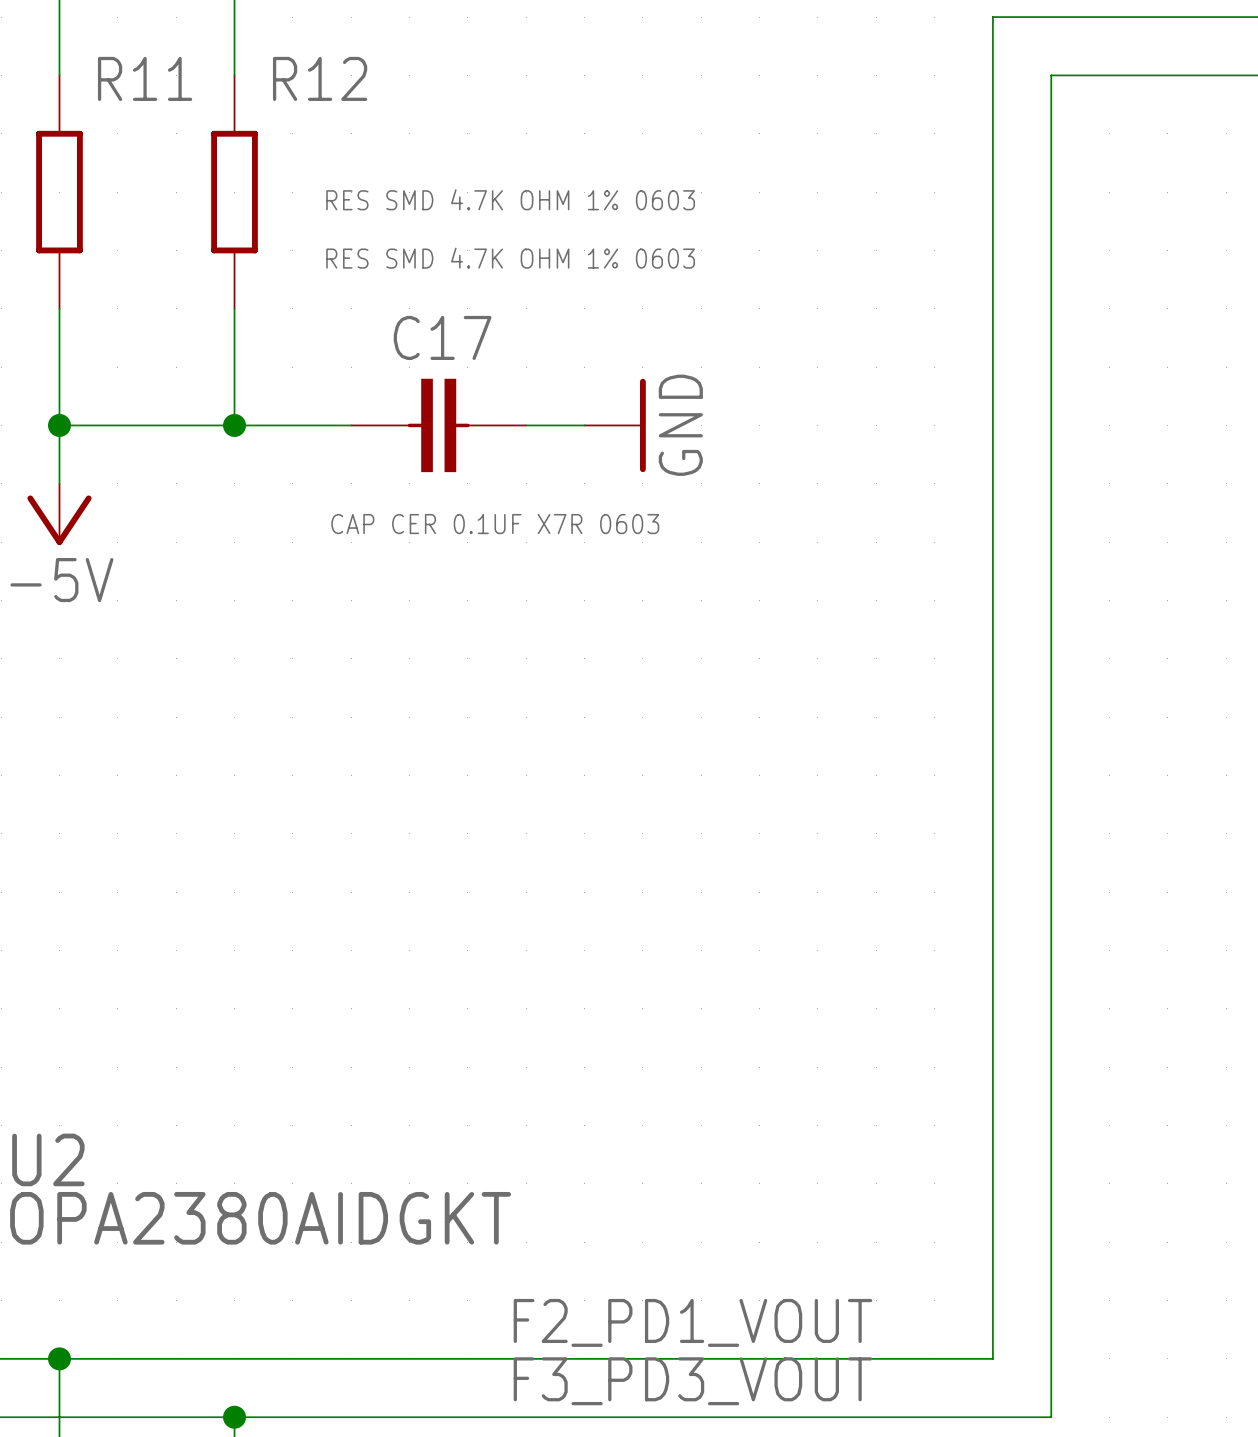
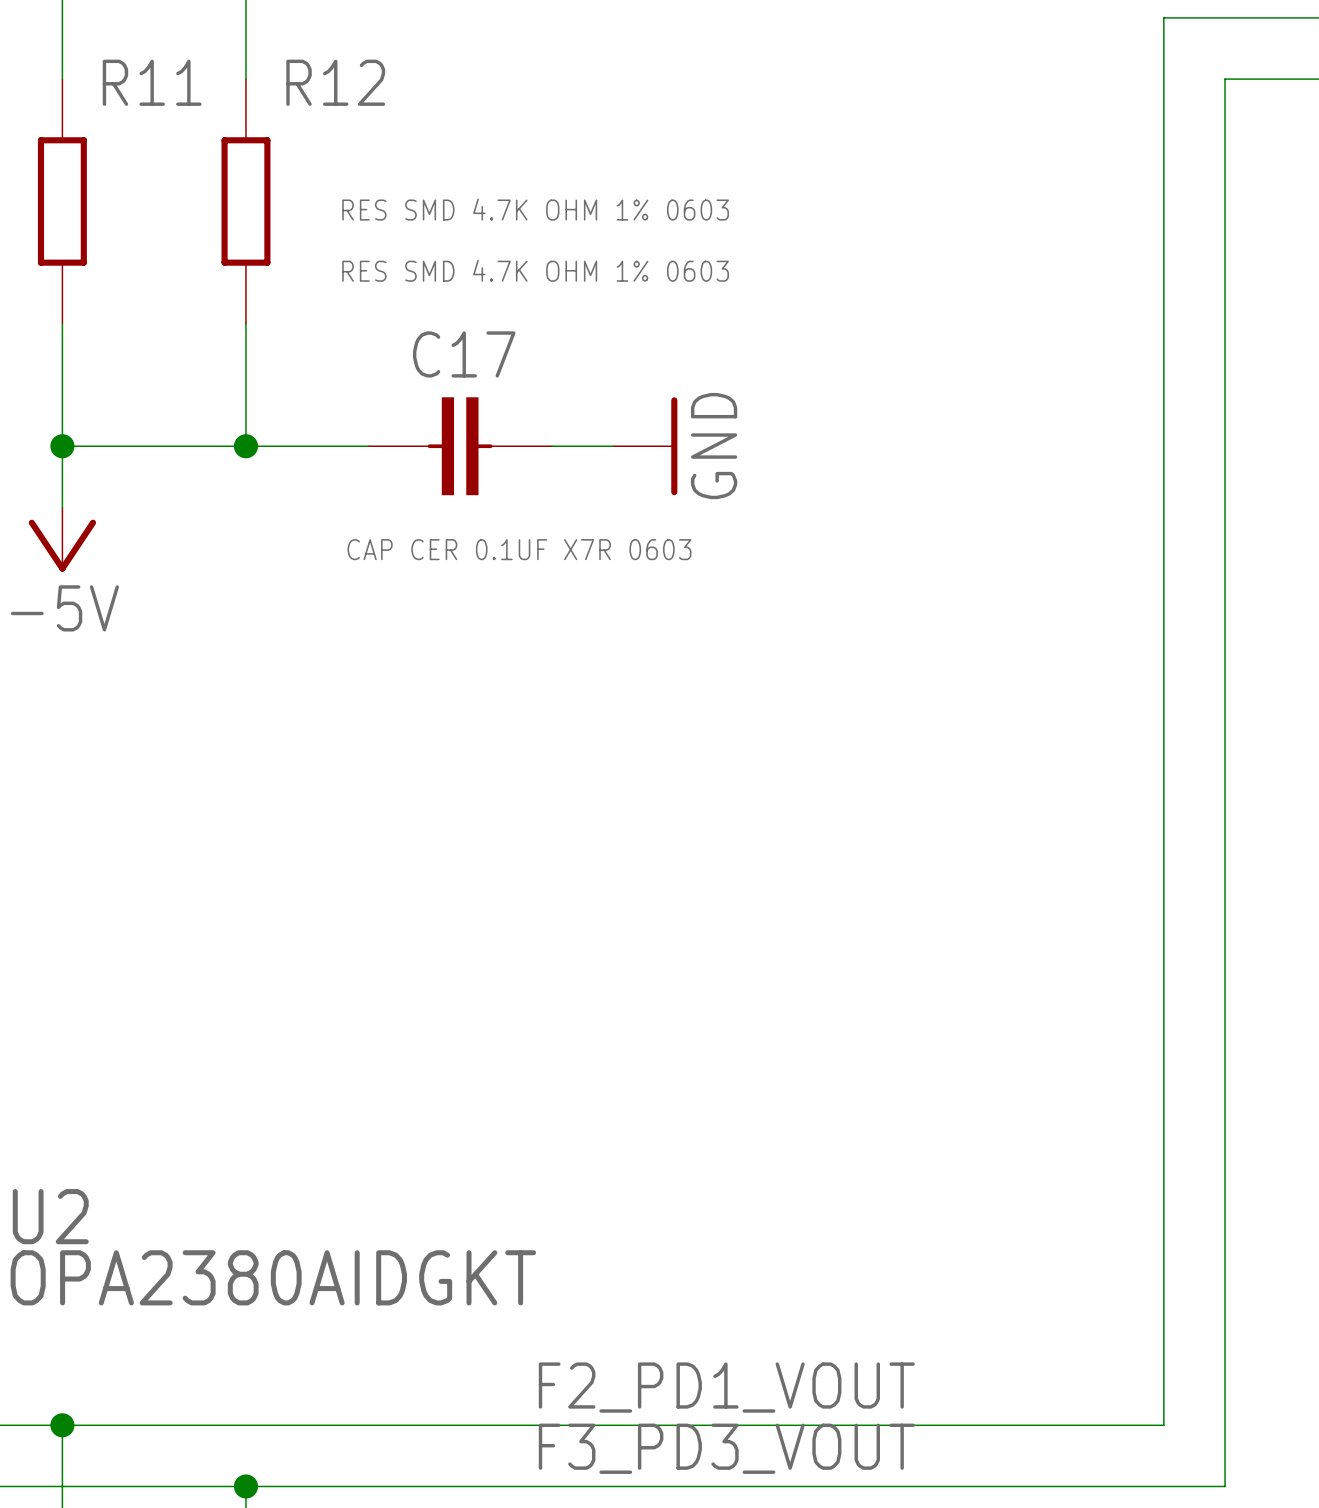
wire: (1109, 17) (992, 17) (992, 1358) -> (1163, 17) (1163, 1425) (1041, 1425)
wire: (1167, 75) (1051, 75) (1051, 1417) -> (1225, 79) (1225, 1486) (1102, 1486)

